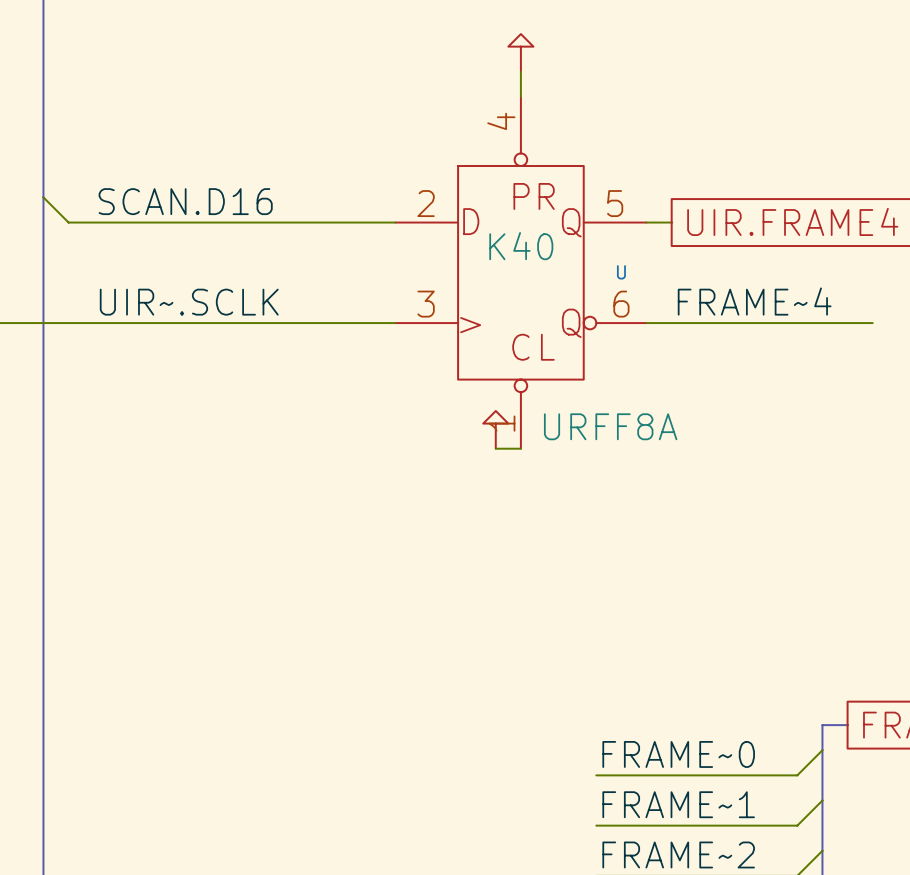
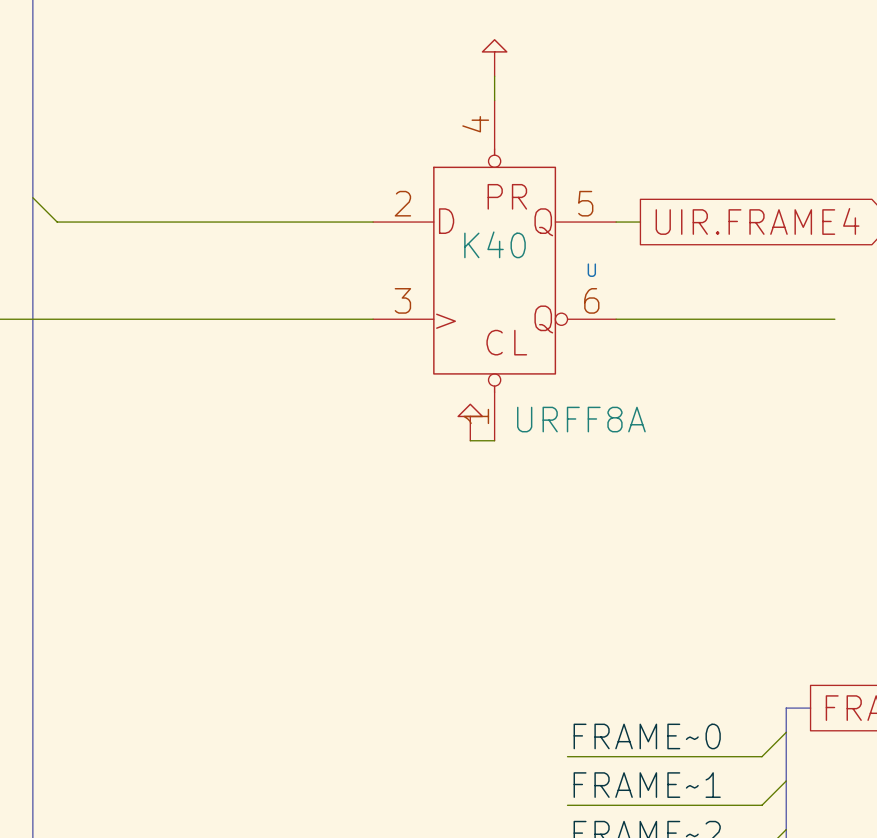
label: SCAN.D16 (185, 201) -> none
label: FRAME~4 (754, 301) -> none
label: UIR~.SCLK (189, 302) -> none

